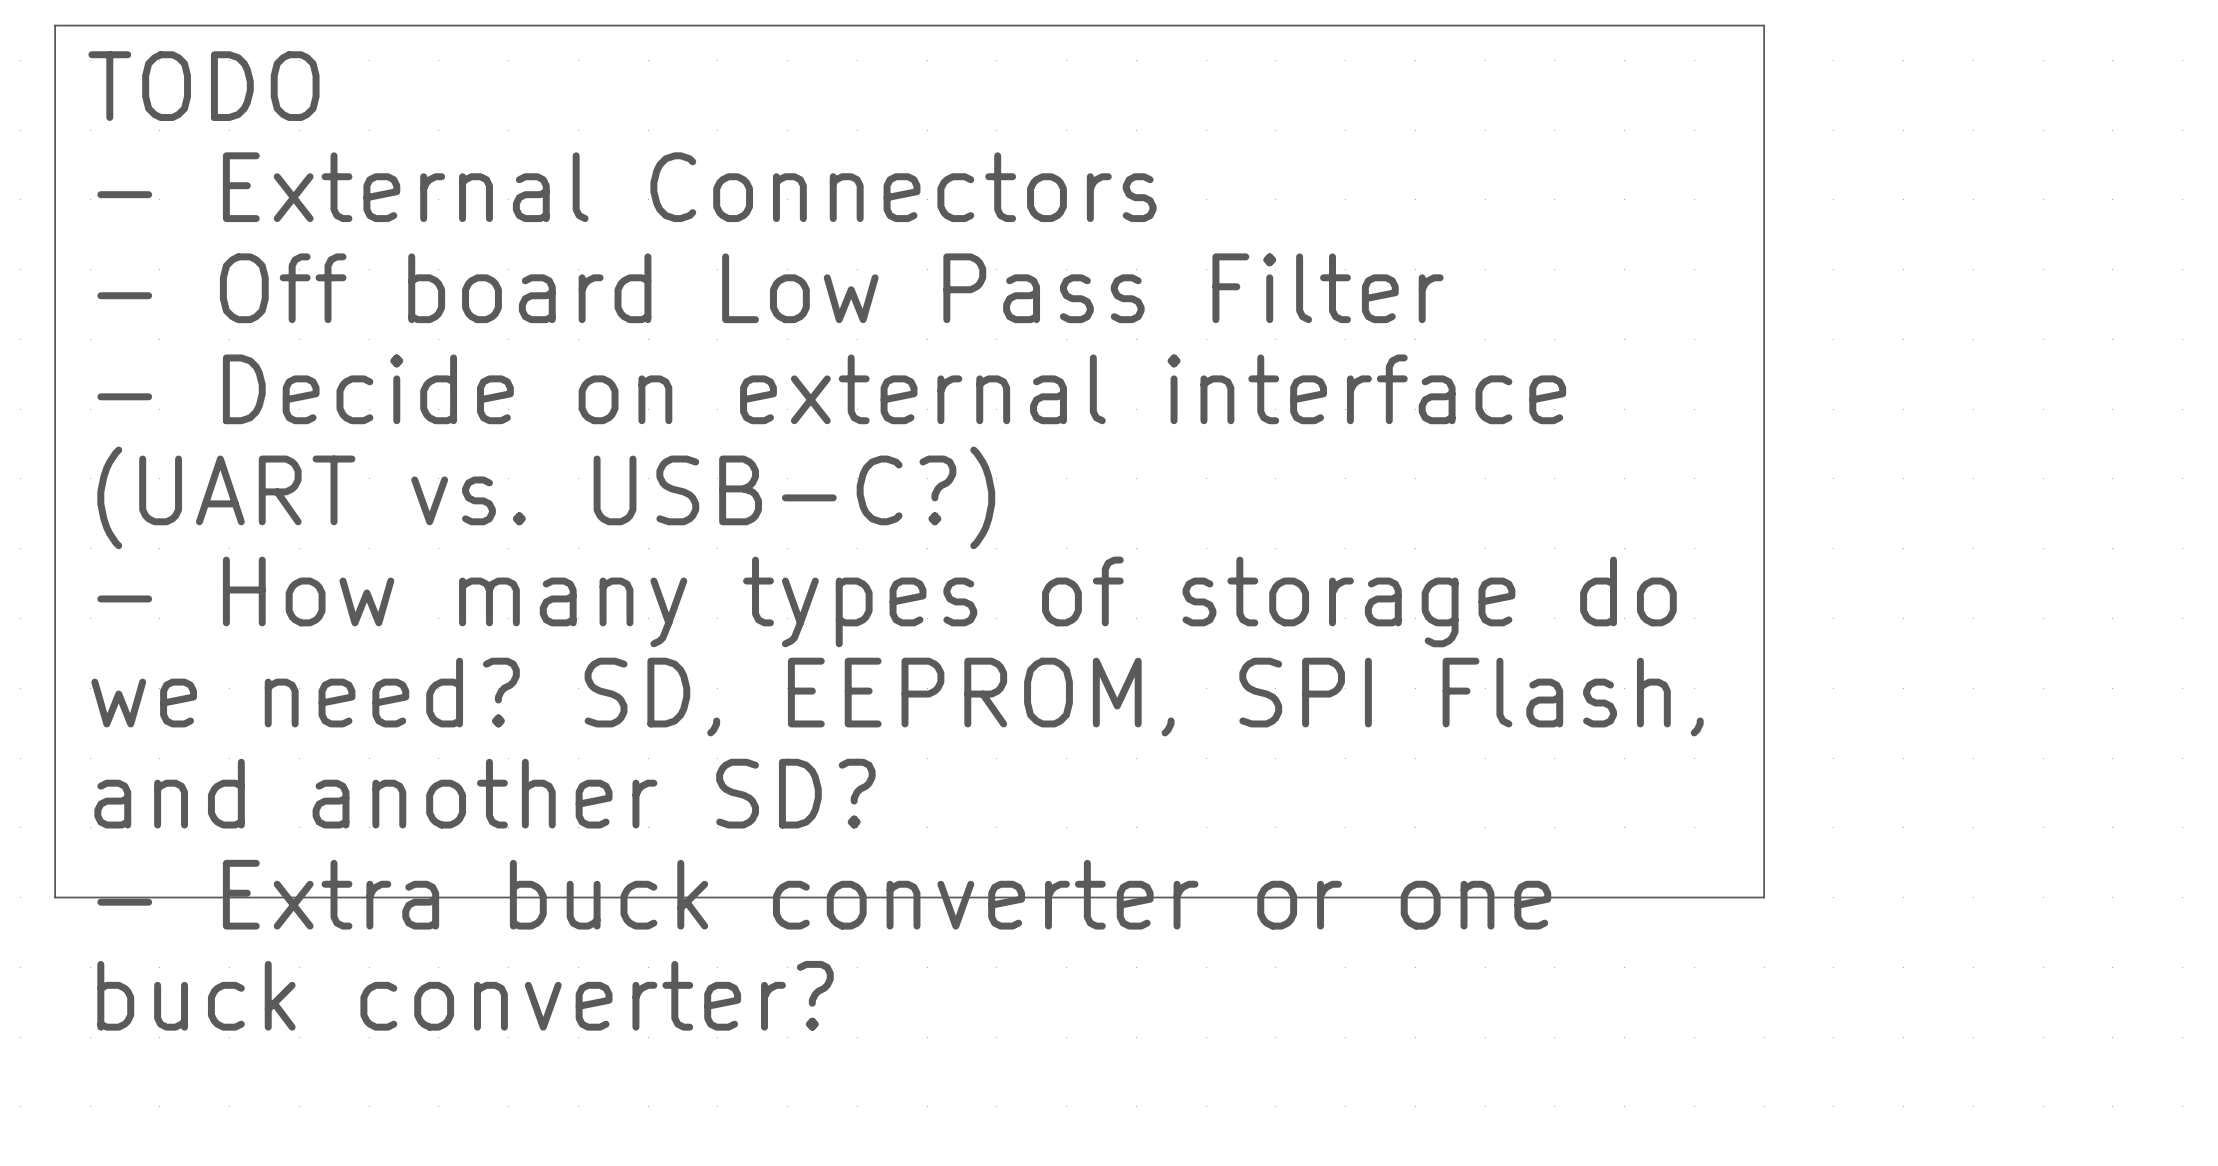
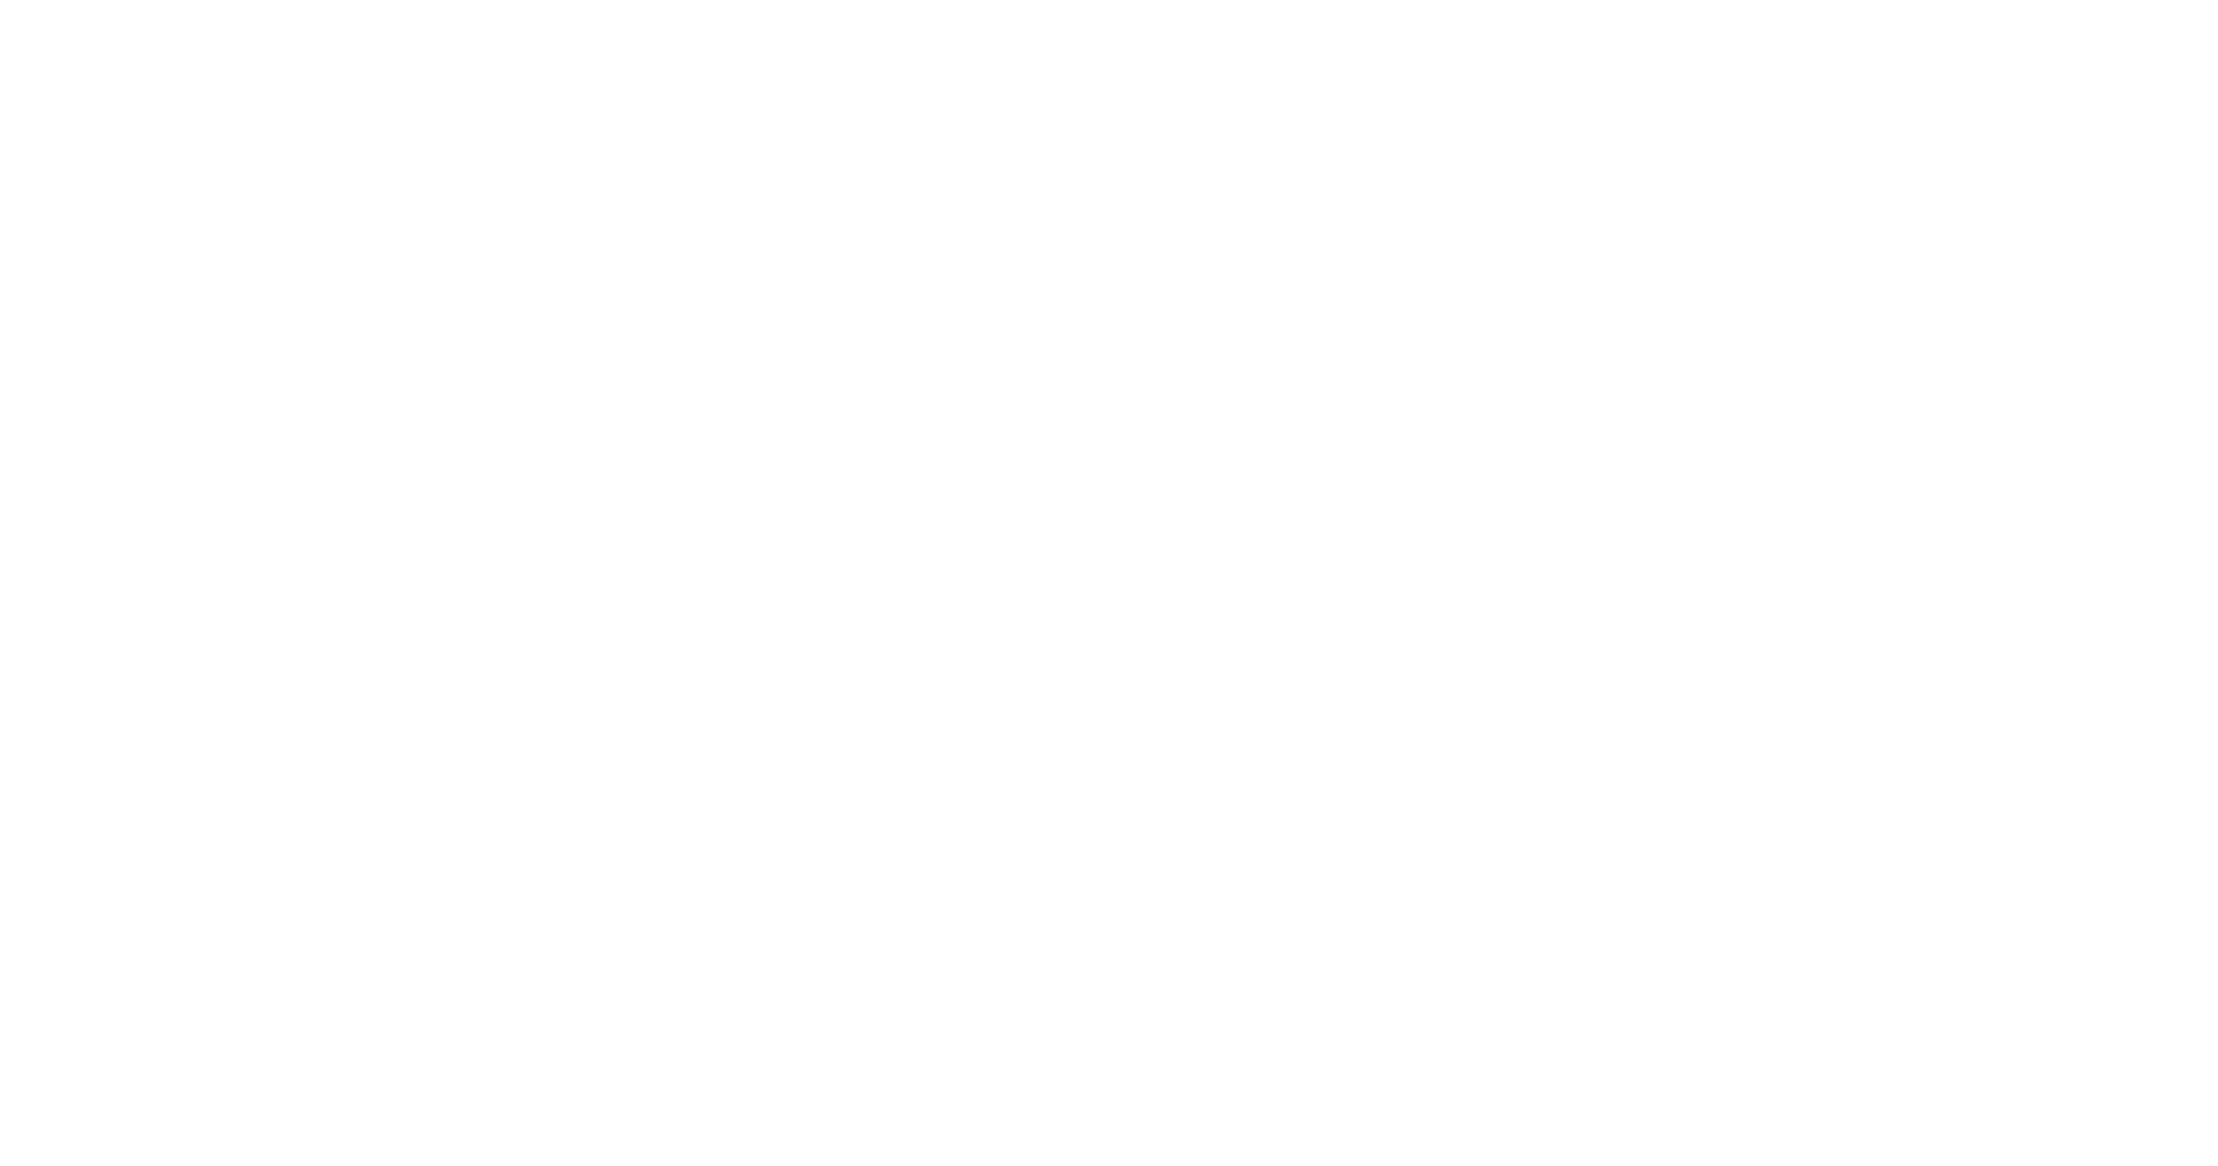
line: (55, 25) (1764, 25) (1764, 897) (55, 897) (55, 25) -> none
text: TODO (203, 86) -> none
text: - External Connectors (626, 187) -> none
text: - Off board Low Pass Filter (770, 288) -> none
text: - Decide on external interface (831, 389) -> none
text: (UART vs. USB-C?) (546, 497) -> none
text: - How many types of storage do (887, 601) -> none
text: we need? SD, EEPROM, SPI Flash, (897, 697) -> none
text: and another SD? (484, 793) -> none
text: - Extra buck converter or one (824, 894) -> none
text: buck converter? (465, 995) -> none

